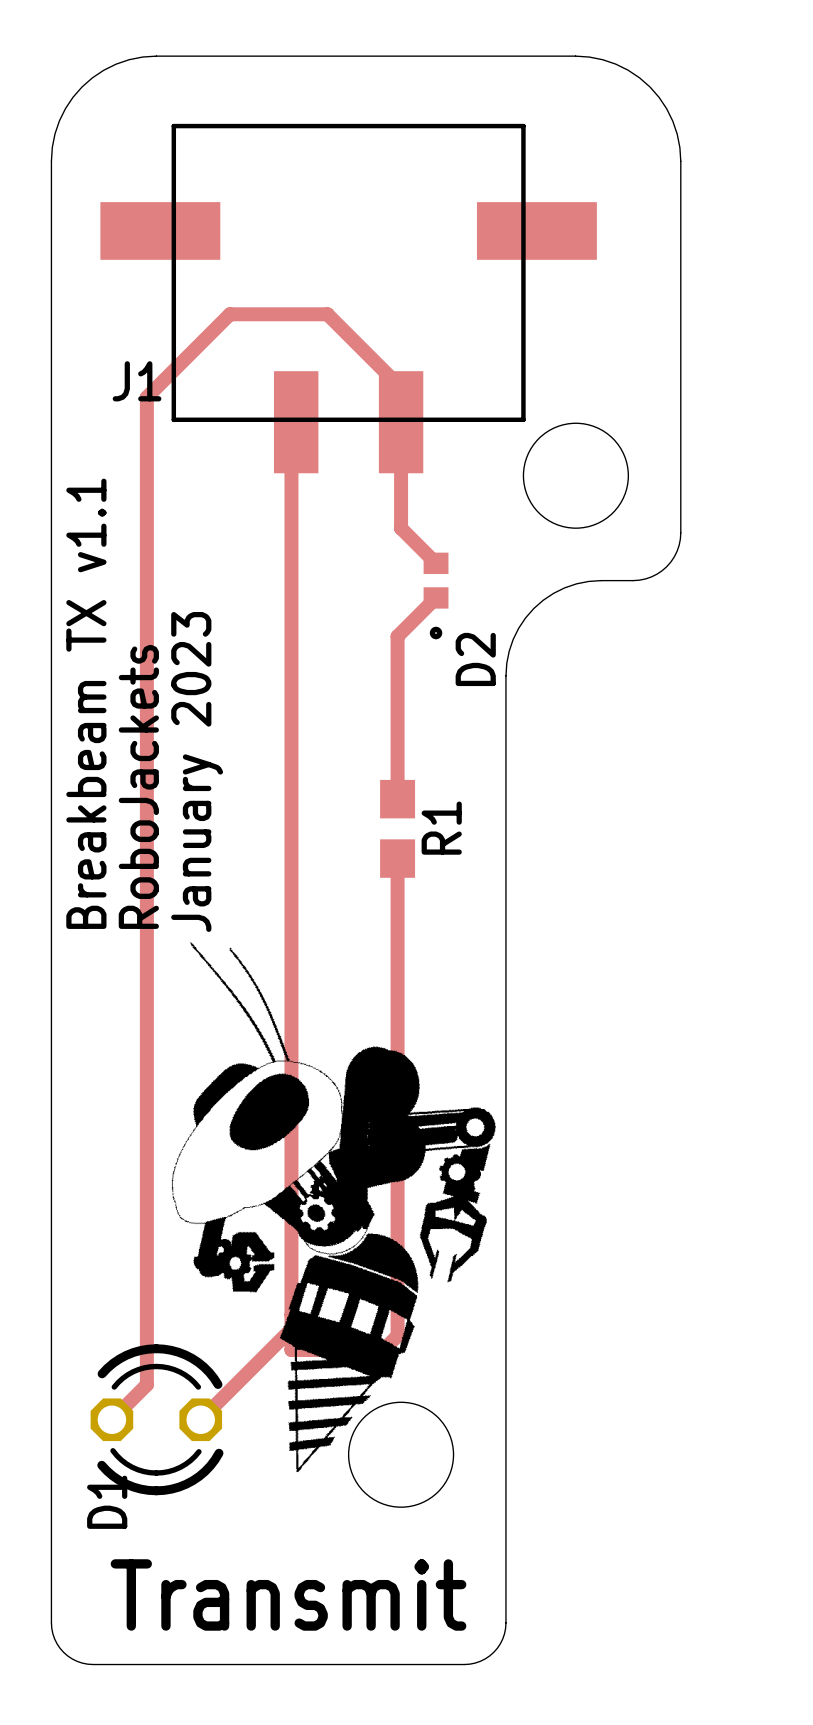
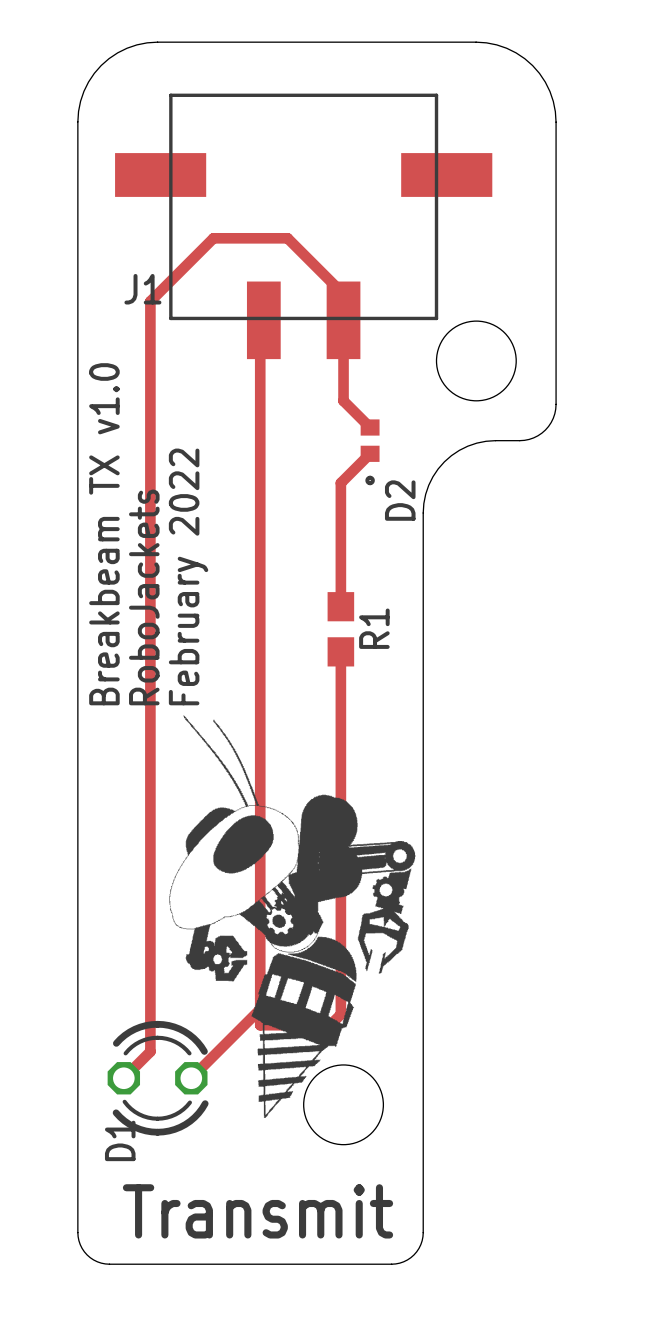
text: Breakbeam TX v1.1 (86, 703) -> Breakbeam TX v1.0 (104, 534)
text: January 2023 (197, 771) -> February 2022 (188, 576)

